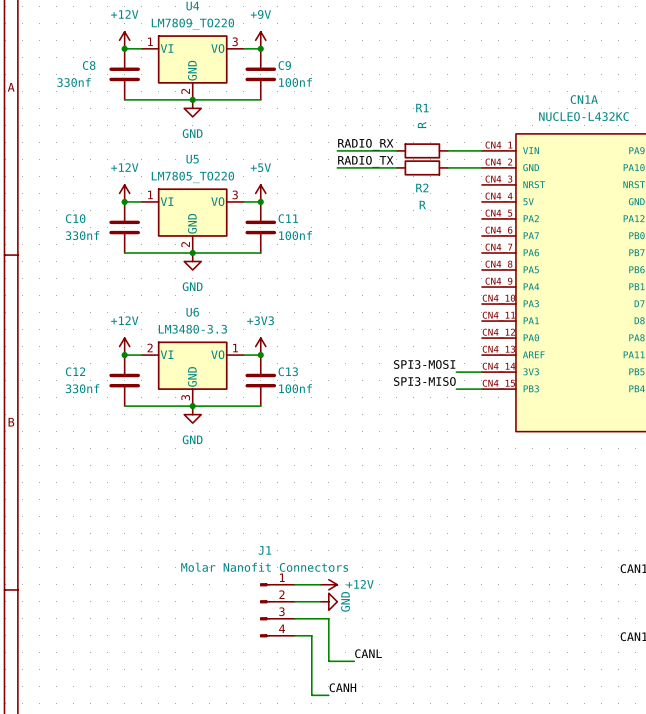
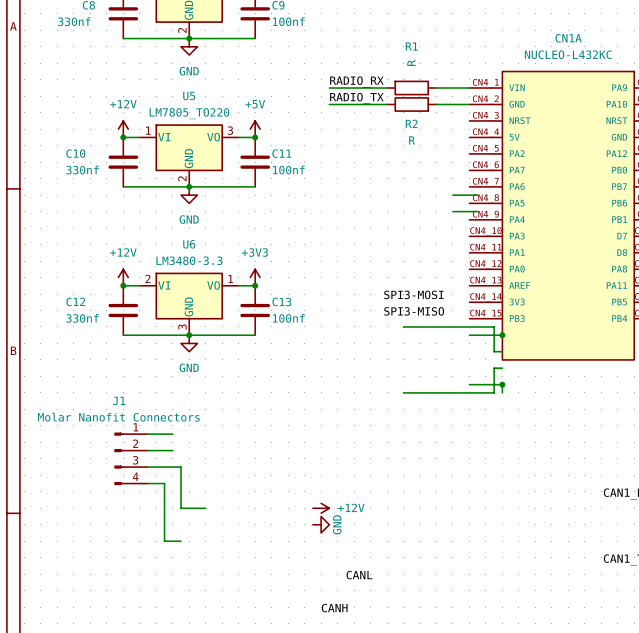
wire: (456, 372) (481, 372) -> (452, 195) (477, 195)
wire: (456, 389) (481, 389) -> (452, 211) (477, 211)
wire: none -> (403, 326) (494, 326) (494, 351) (502, 351)
wire: none -> (469, 335) (502, 335)
junction: none -> (502, 335)
wire: none -> (502, 368) (494, 368) (494, 392) (403, 392)
wire: none -> (469, 384) (502, 384) (502, 392)
junction: none -> (502, 384)
wire: (294, 584) (320, 584) -> (148, 434) (172, 434)
wire: (294, 601) (320, 601) -> (148, 450) (172, 450)
J1 position: (277, 610) -> (131, 458)
wire: (294, 618) (328, 618) (328, 661) (354, 661) -> (148, 467) (181, 467) (181, 508) (205, 508)
wire: (294, 635) (311, 635) (311, 695) (328, 695) -> (148, 483) (164, 483) (164, 541) (181, 541)

